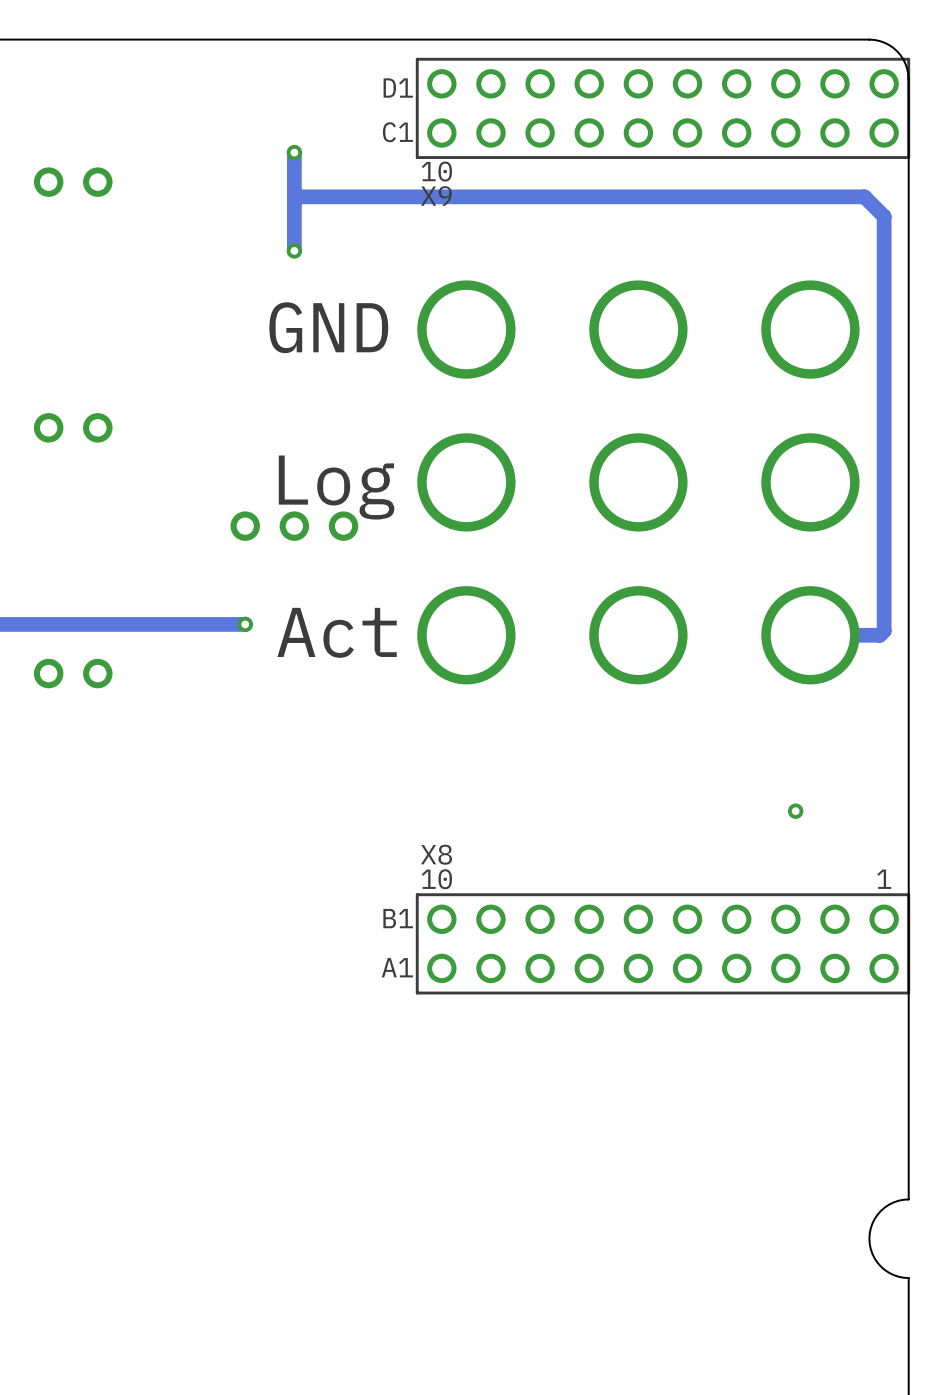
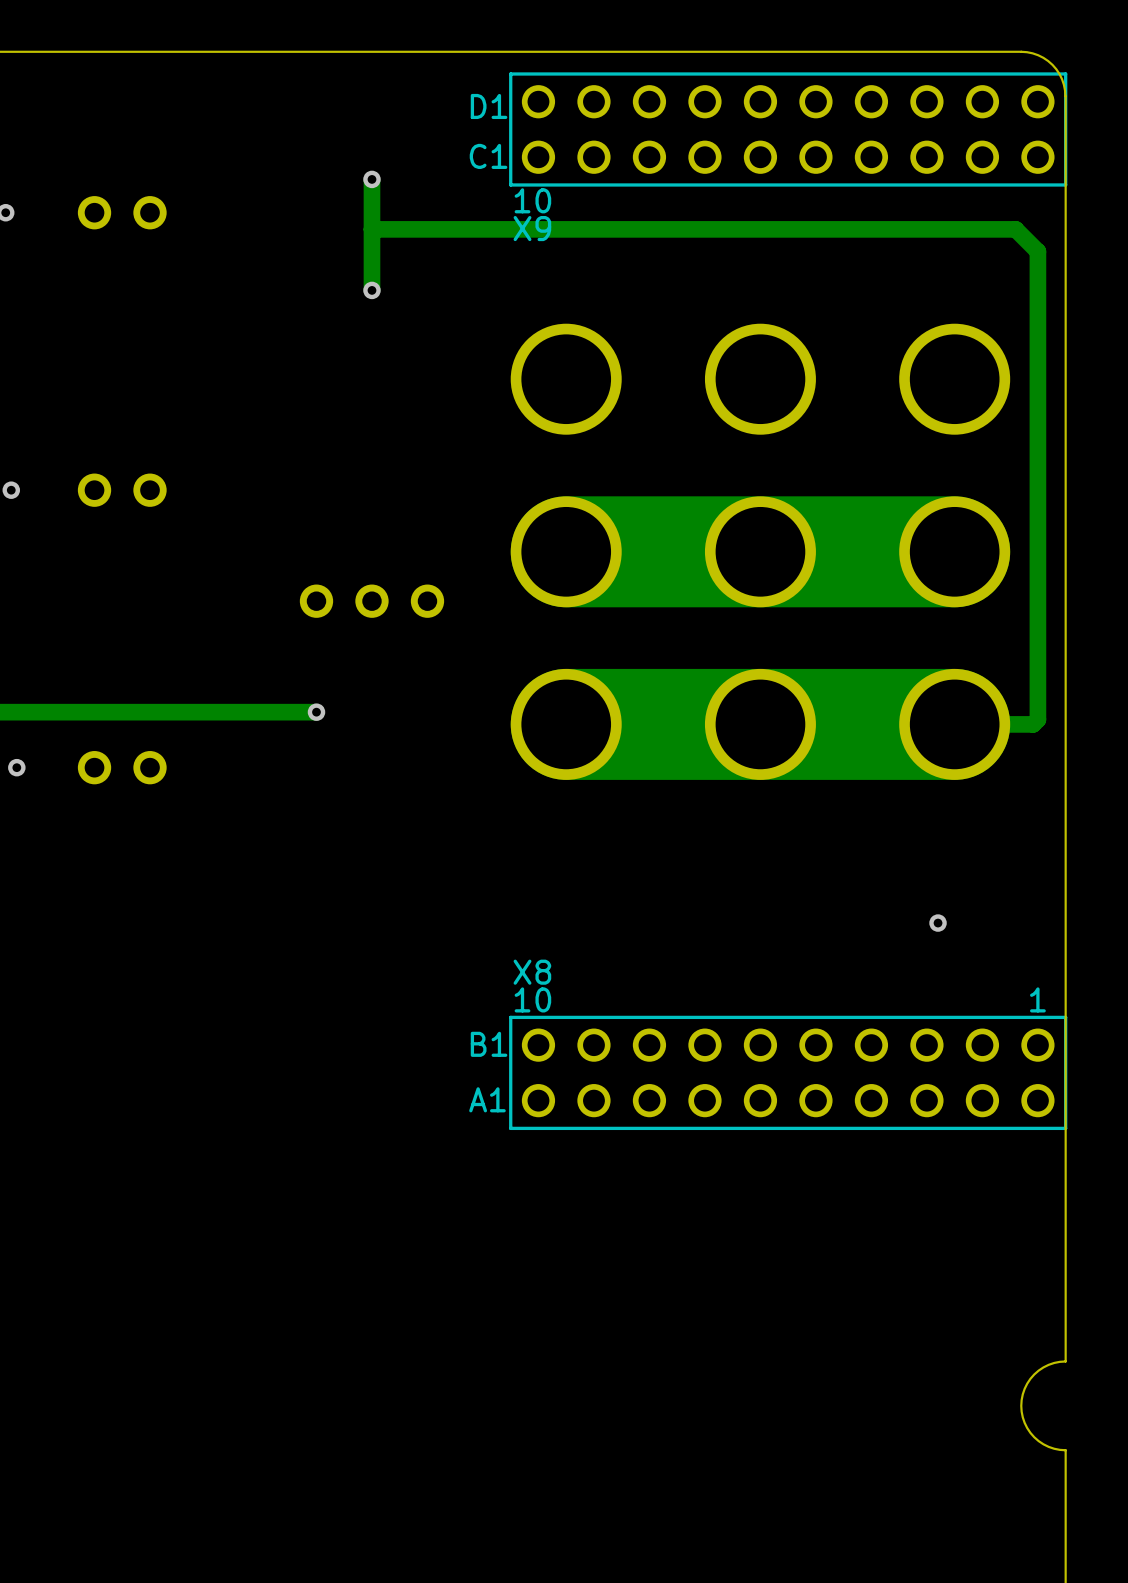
text: GND (328, 327) -> none
track: none -> (954, 551) (566, 551)
text: Log (336, 487) -> none
text: Act (337, 632) -> none
track: none -> (954, 724) (566, 724)

